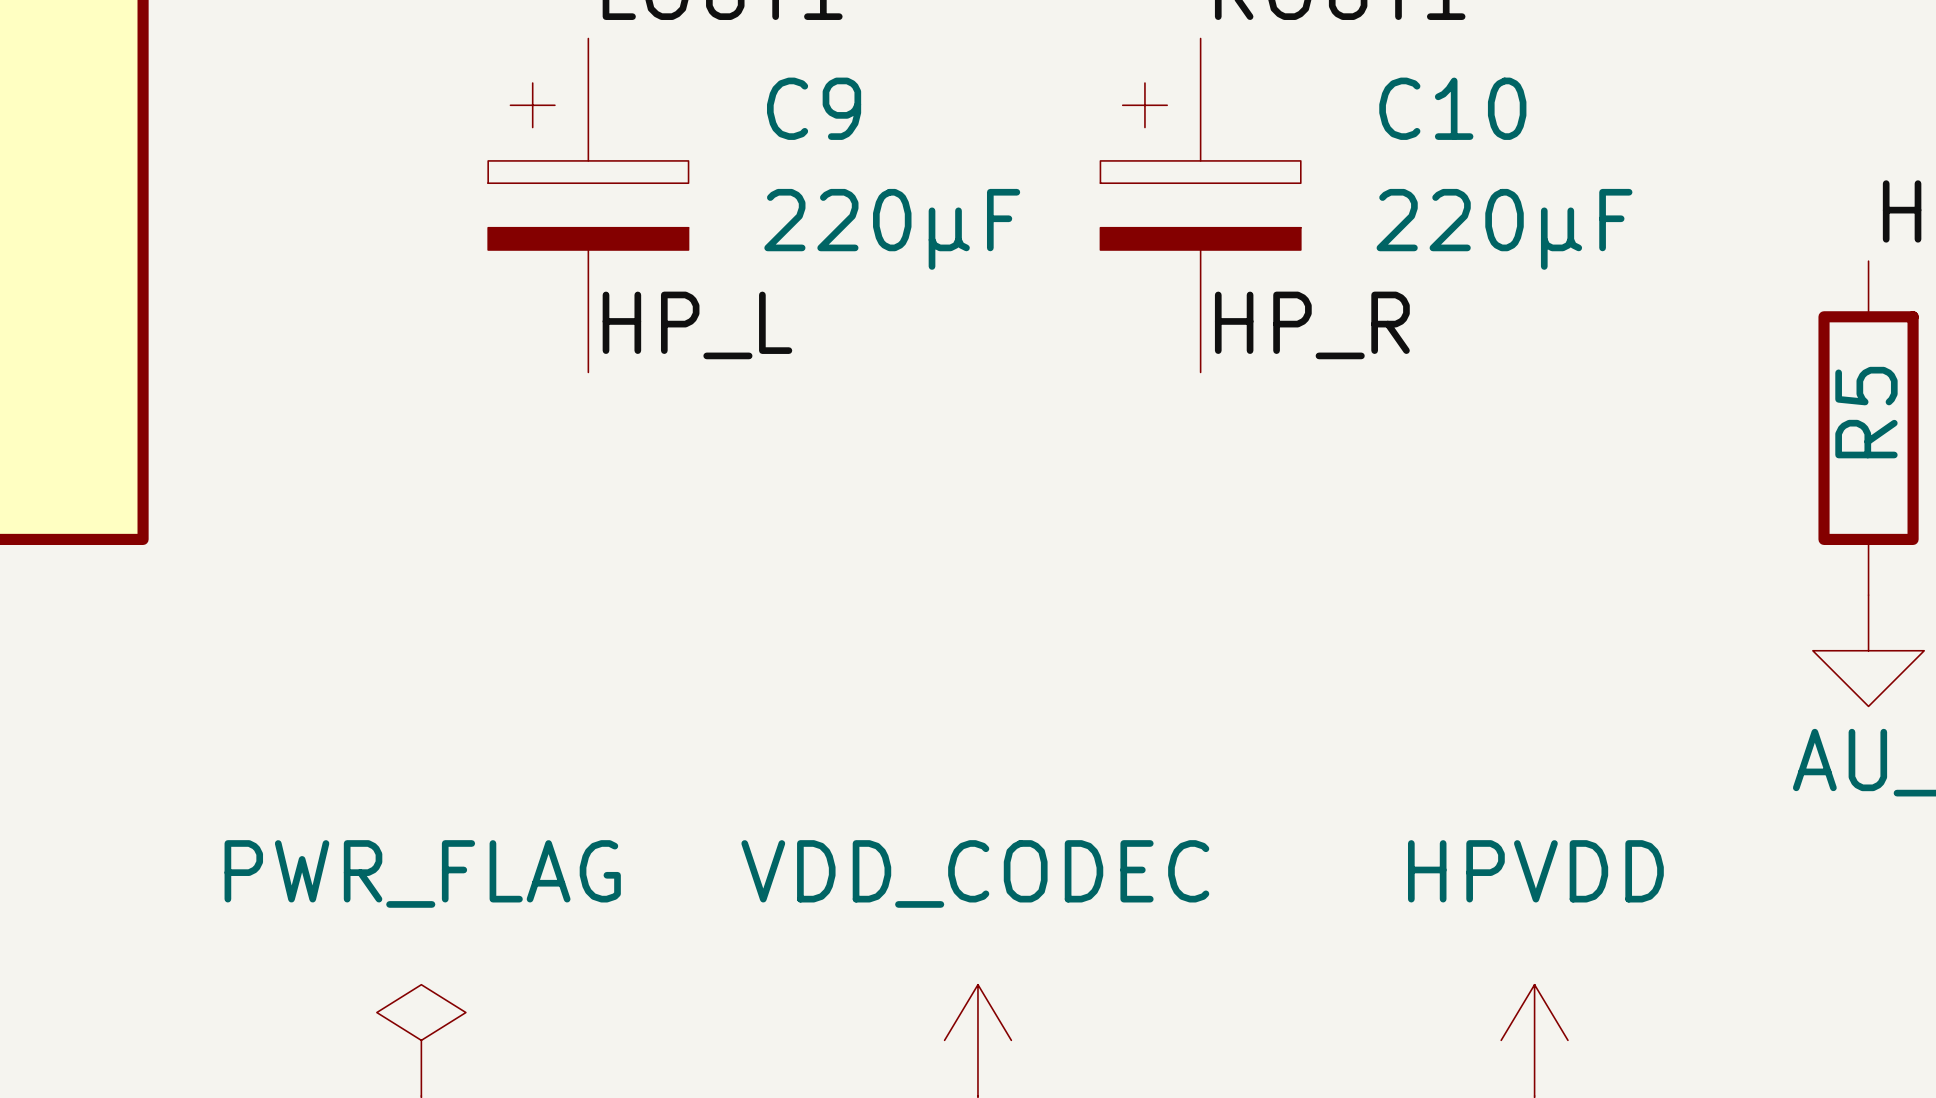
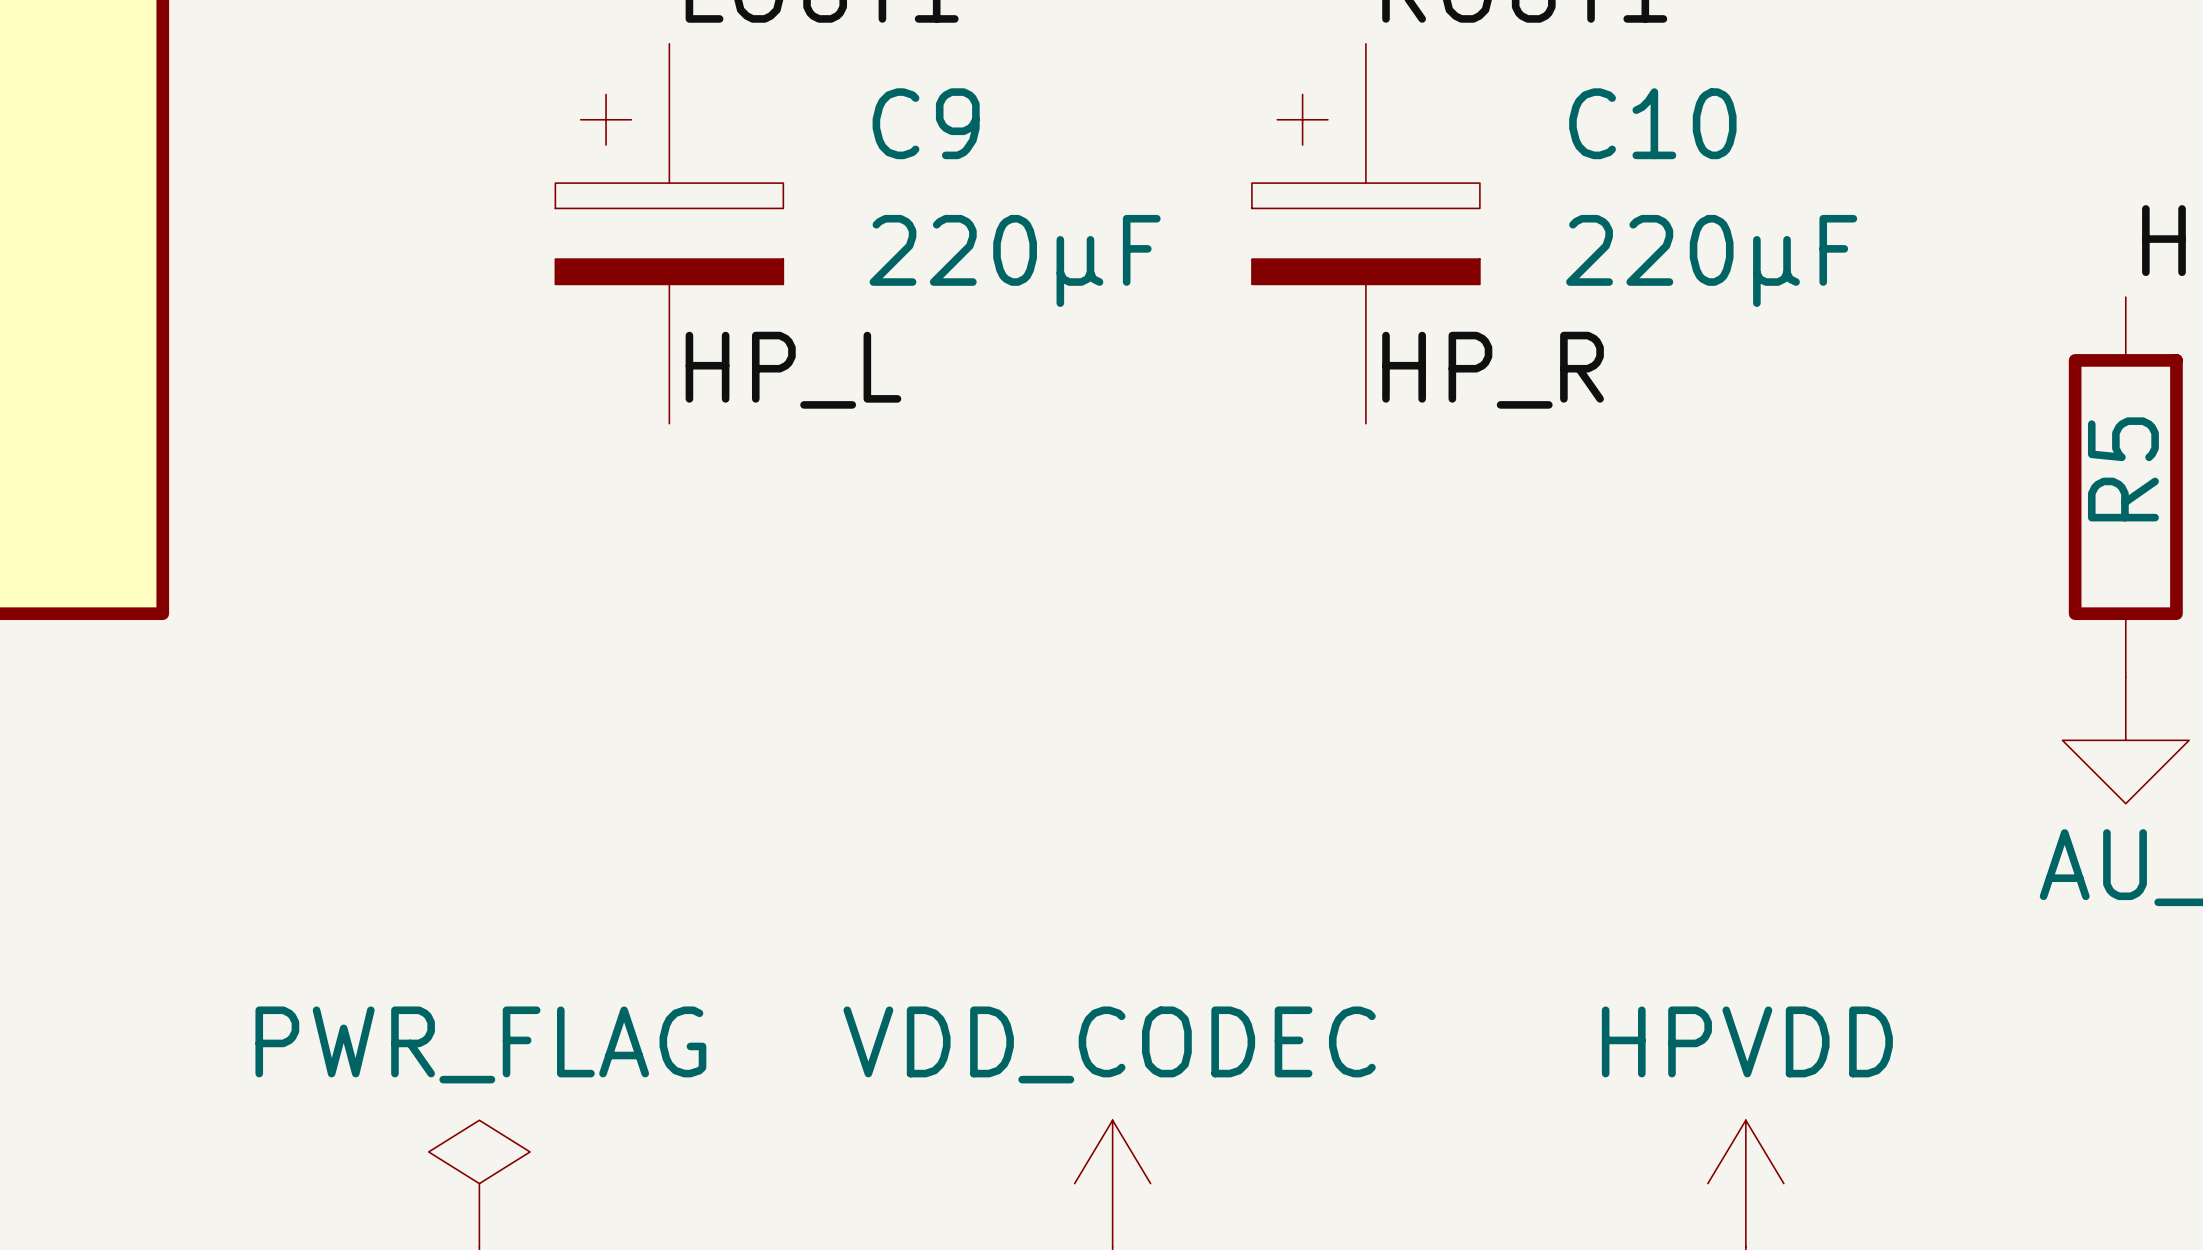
power symbol text position: HPVDD (1535, 871) -> HPVDD (1747, 1041)
power symbol text position: PWR_FLAG (422, 873) -> PWR_FLAG (480, 1044)
power symbol text position: VDD_CODEC (975, 873) -> VDD_CODEC (1109, 1044)

